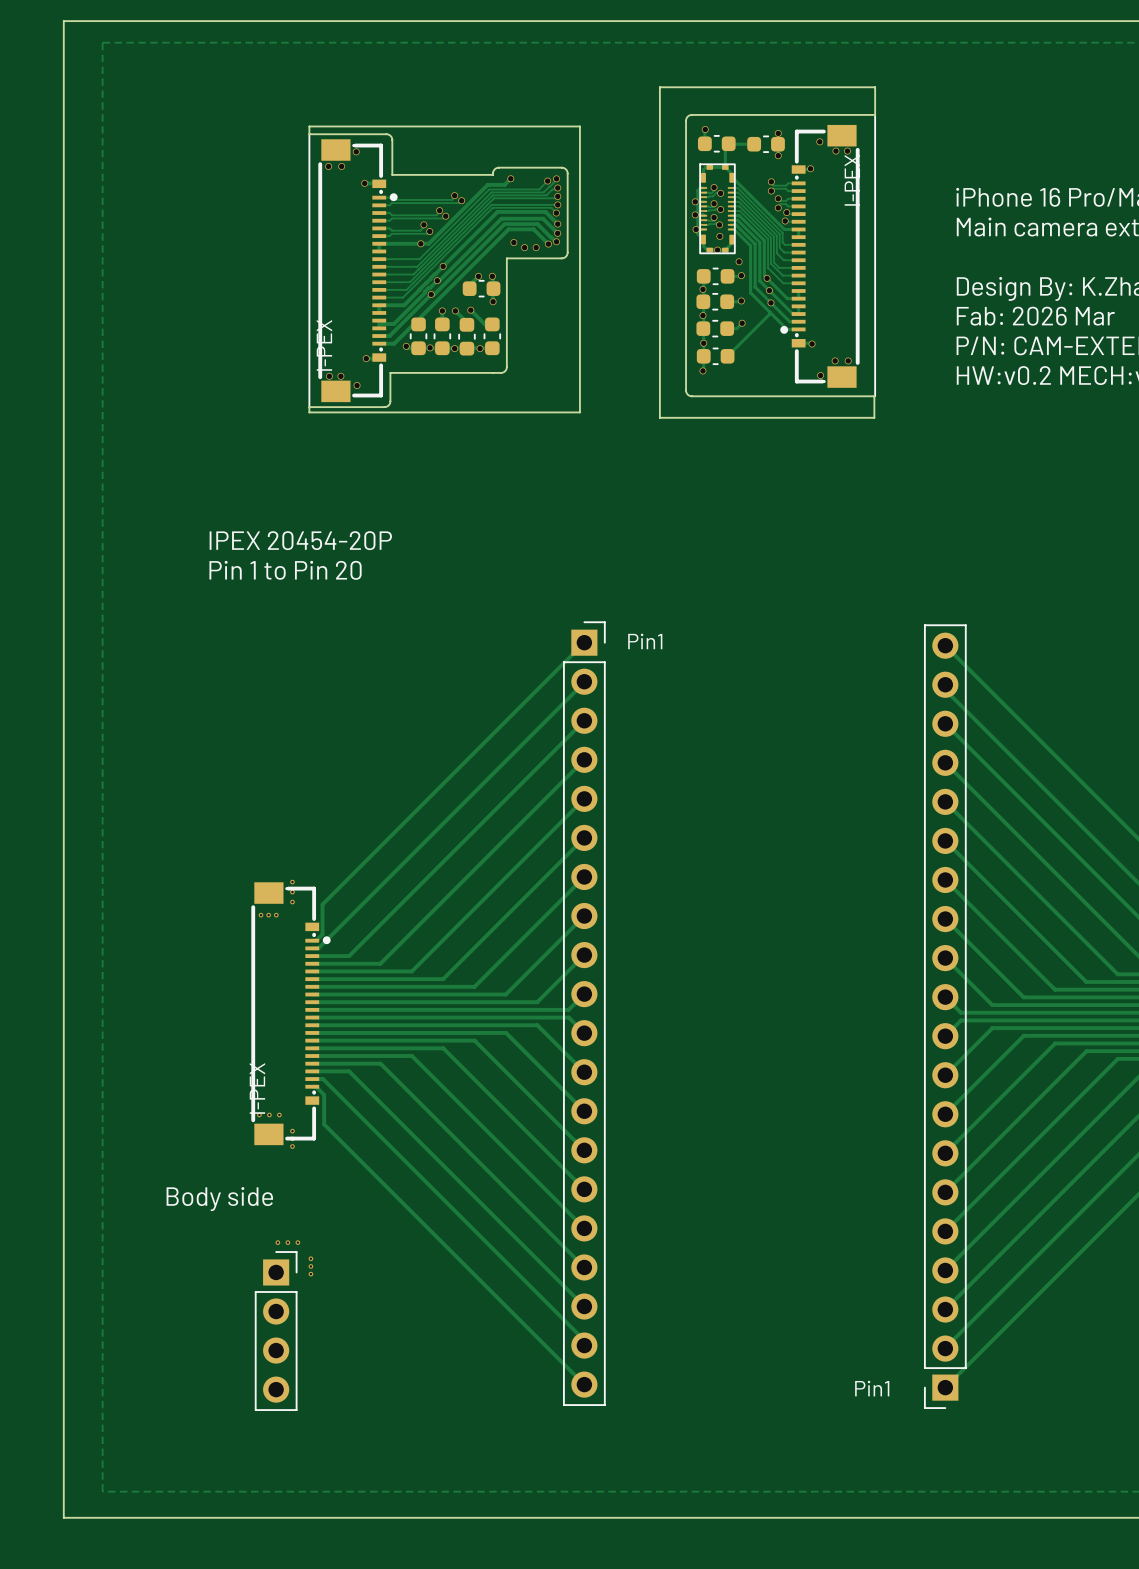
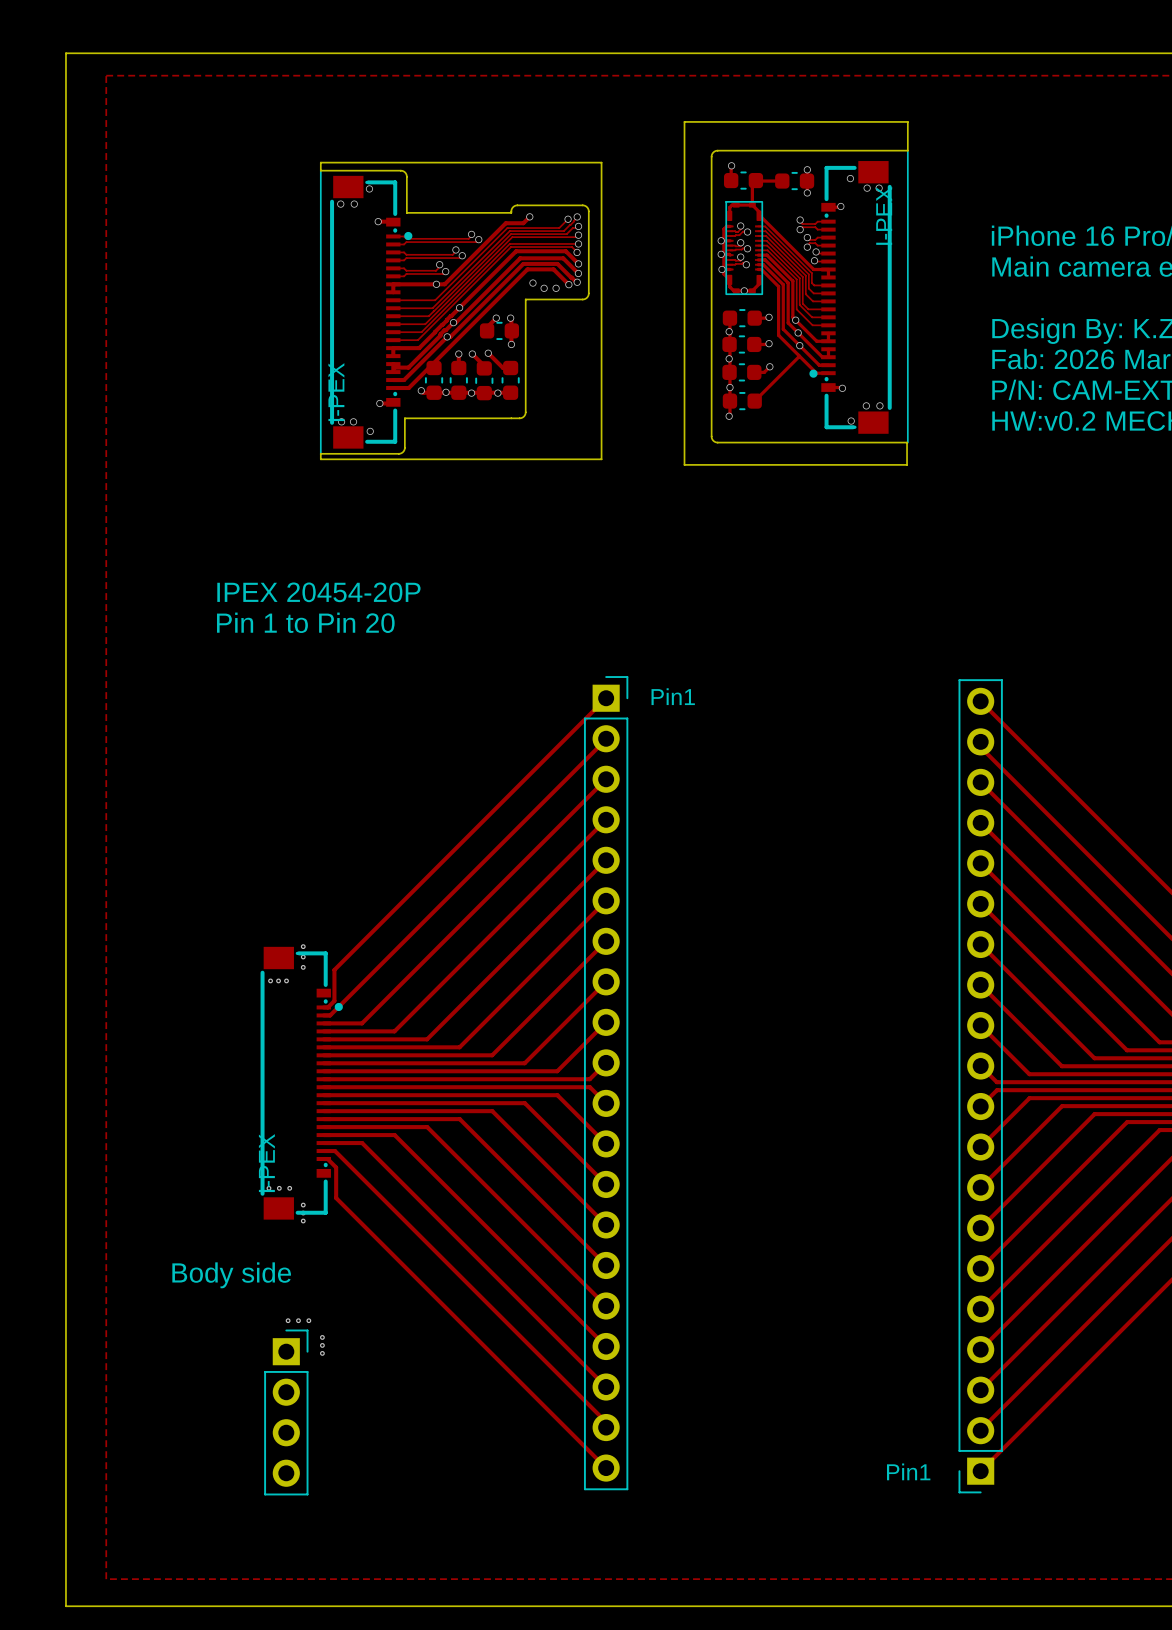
via: (719, 236) -> none
via: (739, 261) -> none

